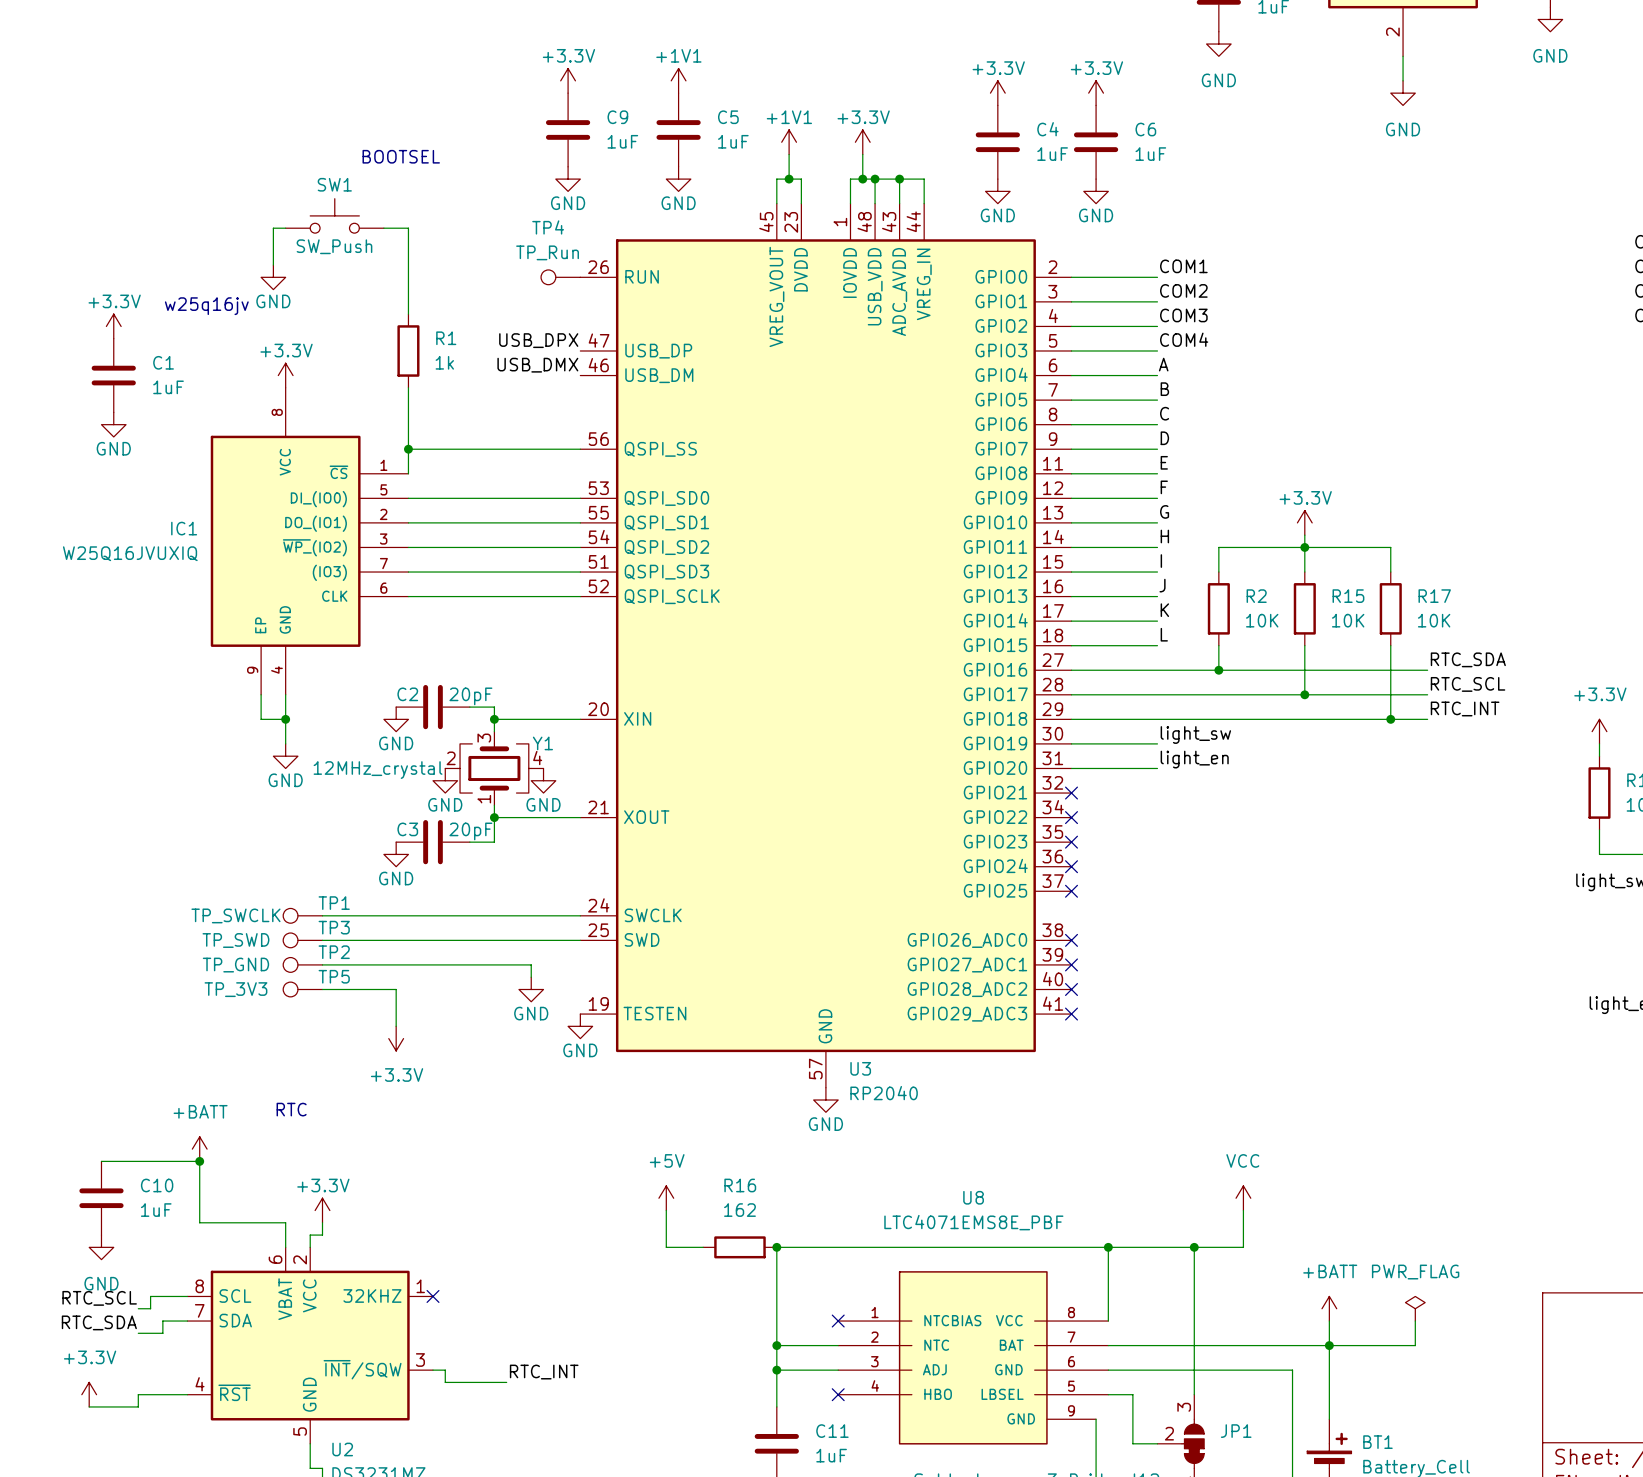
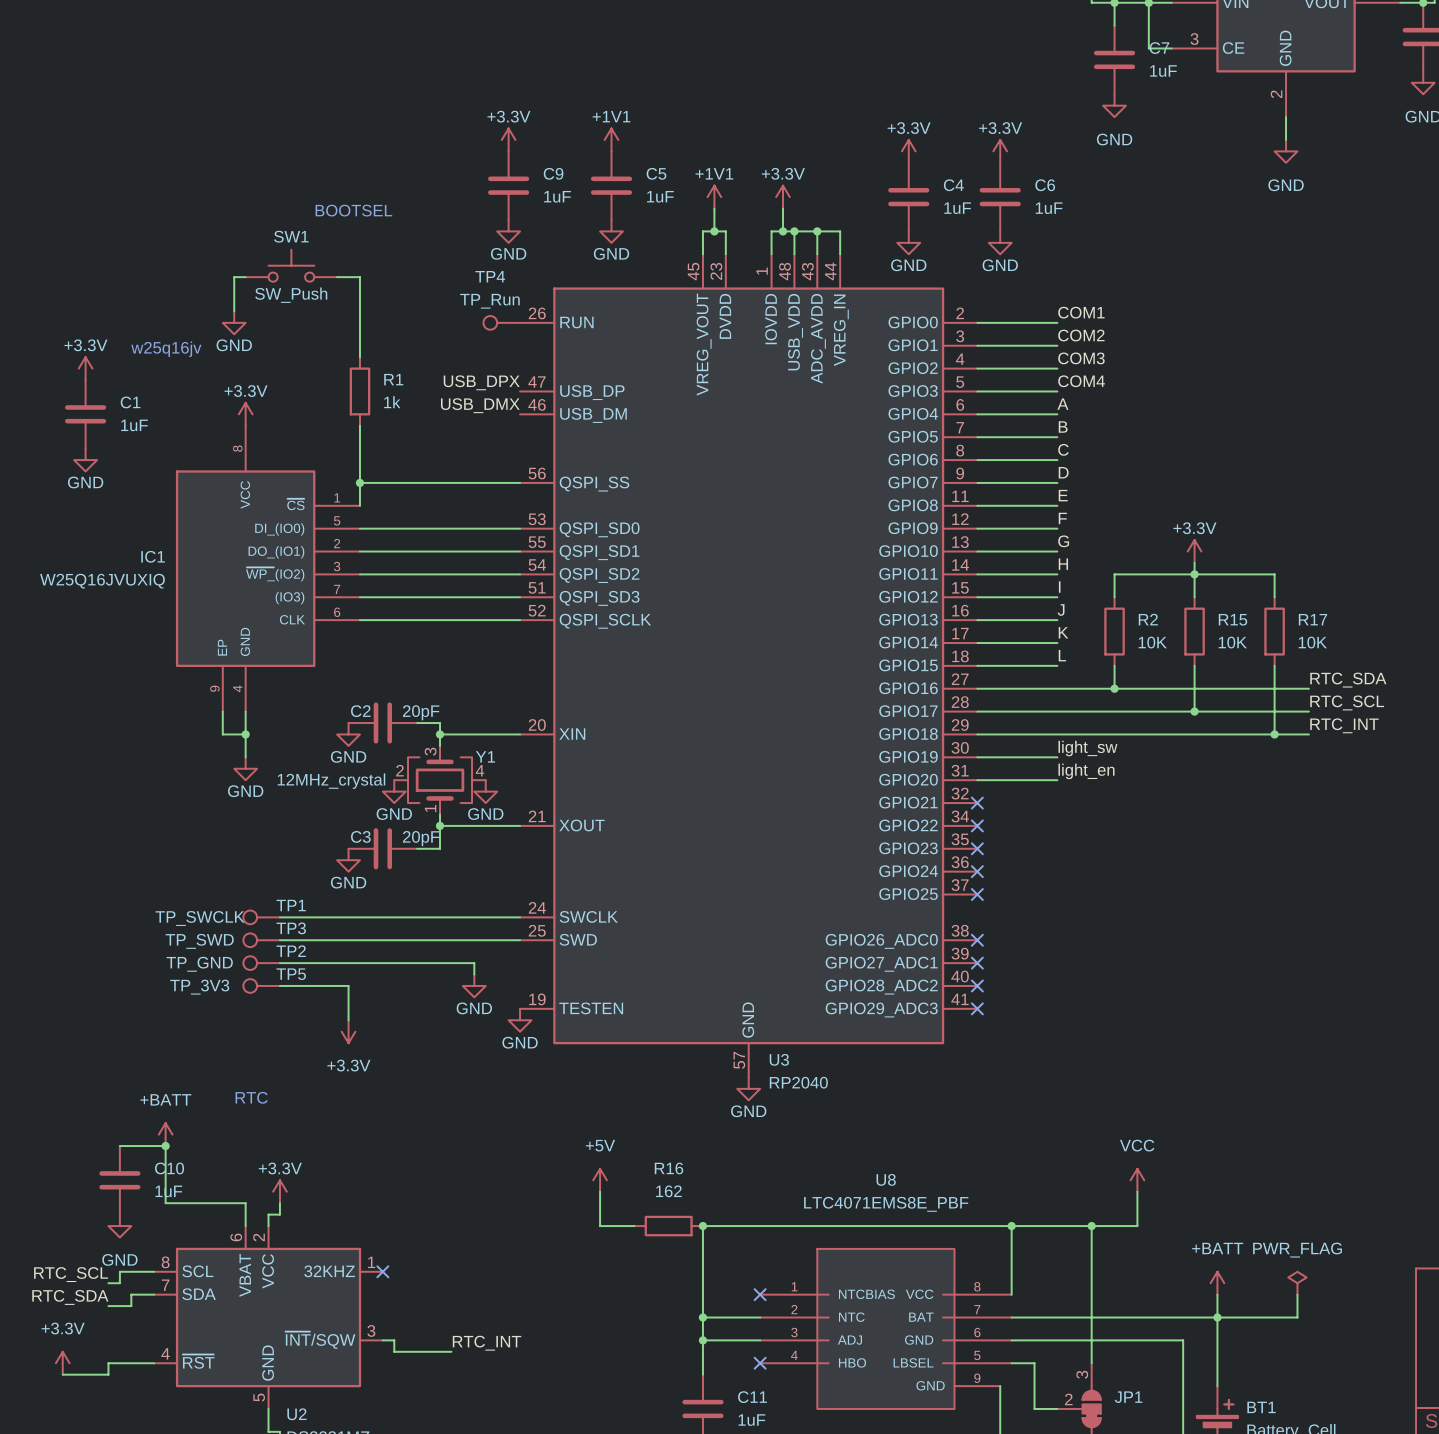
wire: (101, 1161) (150, 1161) -> none
C10 position: (101, 1198) -> (119, 1180)
power symbol position: GND (101, 1247) -> GND (119, 1226)

